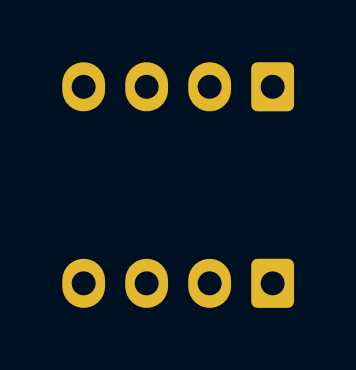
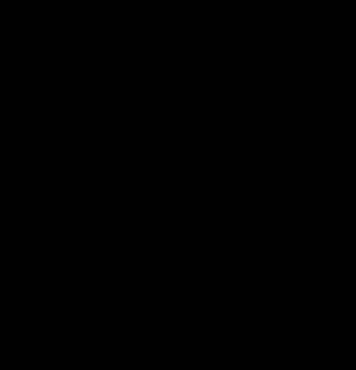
part: (178, 86) -> none
part: (178, 283) -> none

